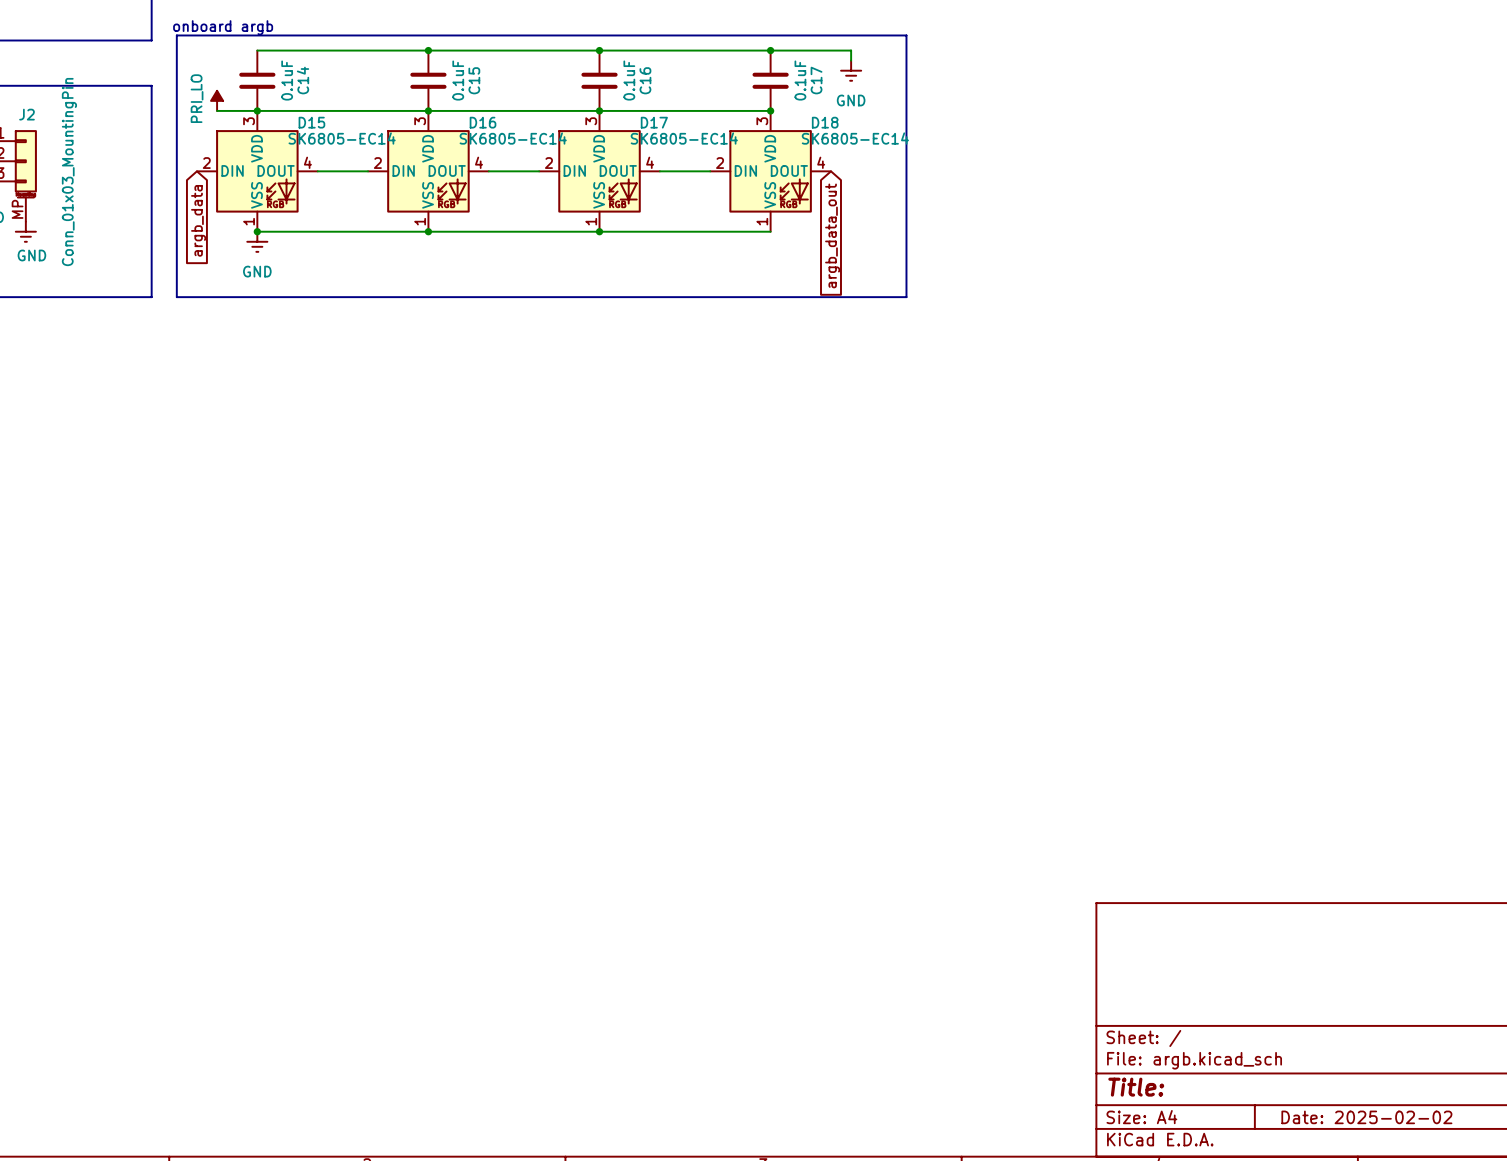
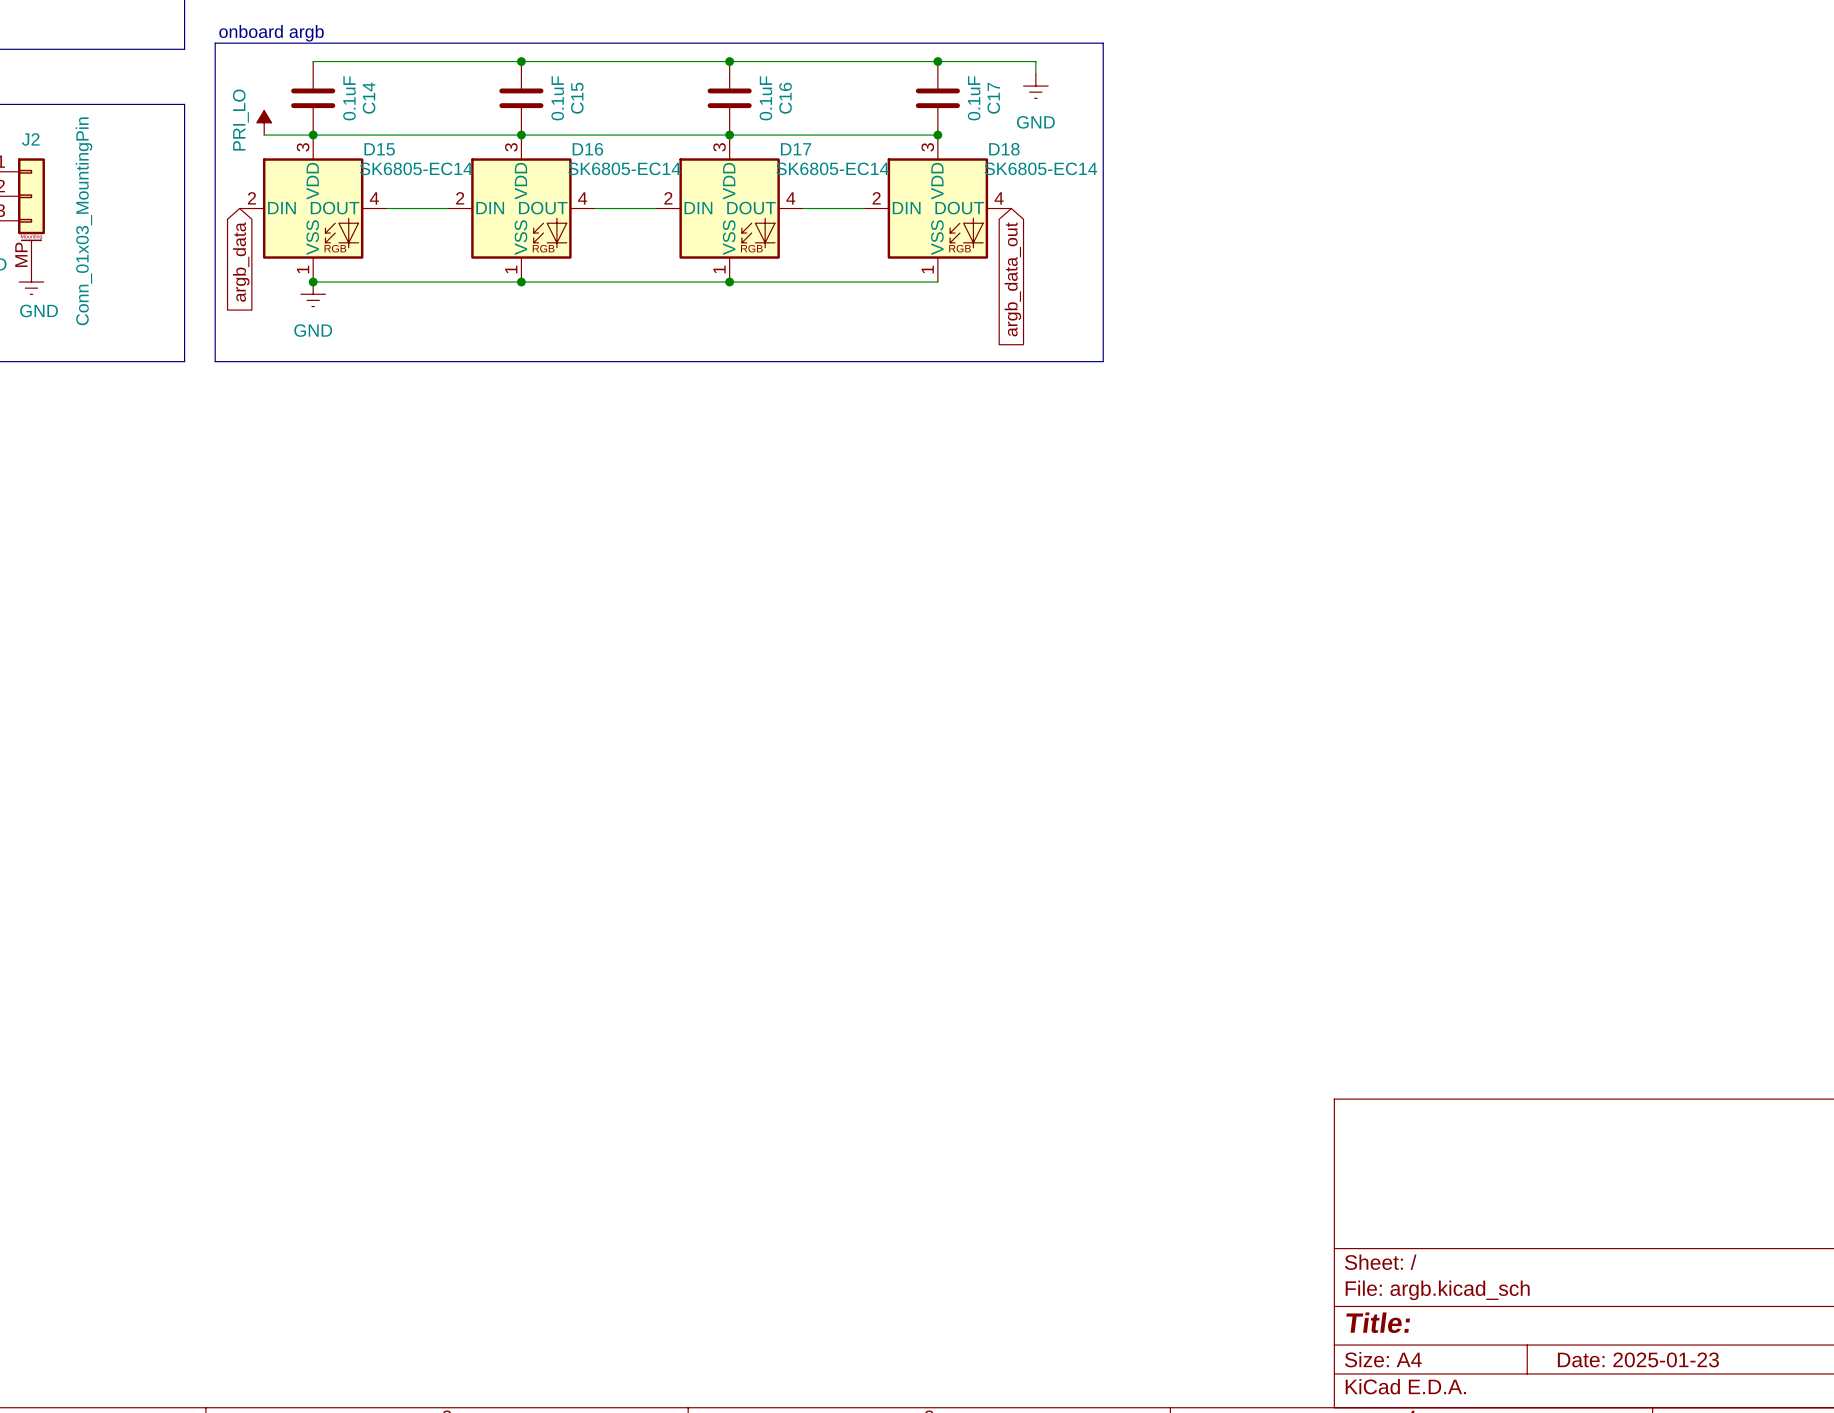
title block: Date: 2025-02-02 (1366, 1117) -> Date: 2025-01-23 (1638, 1359)

